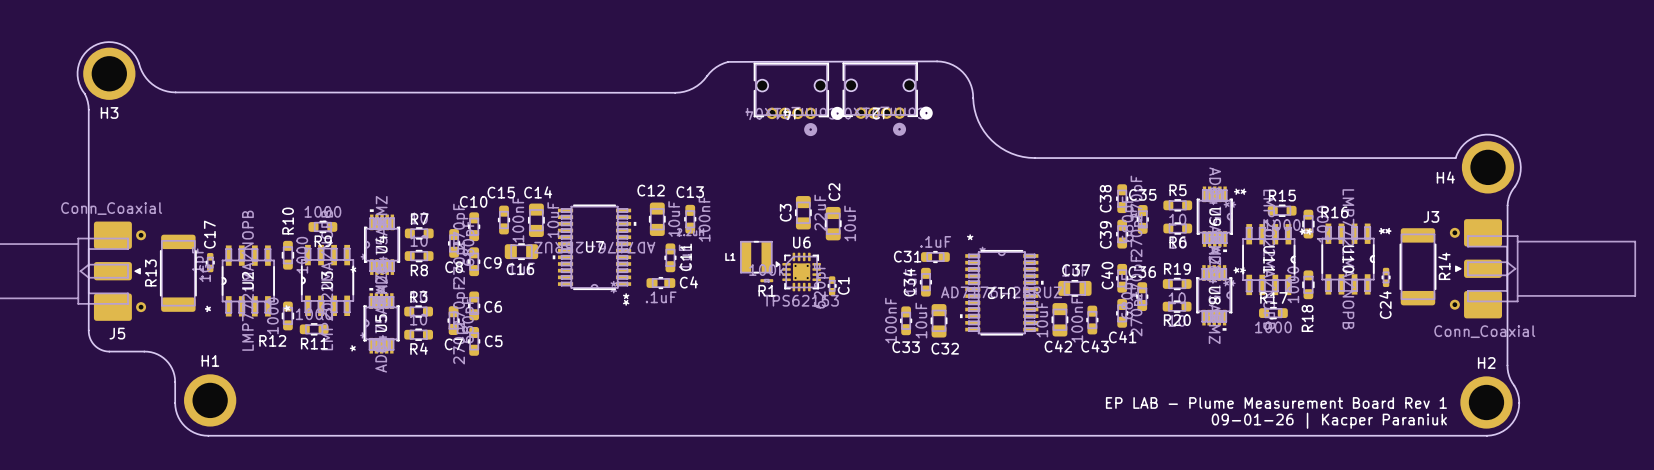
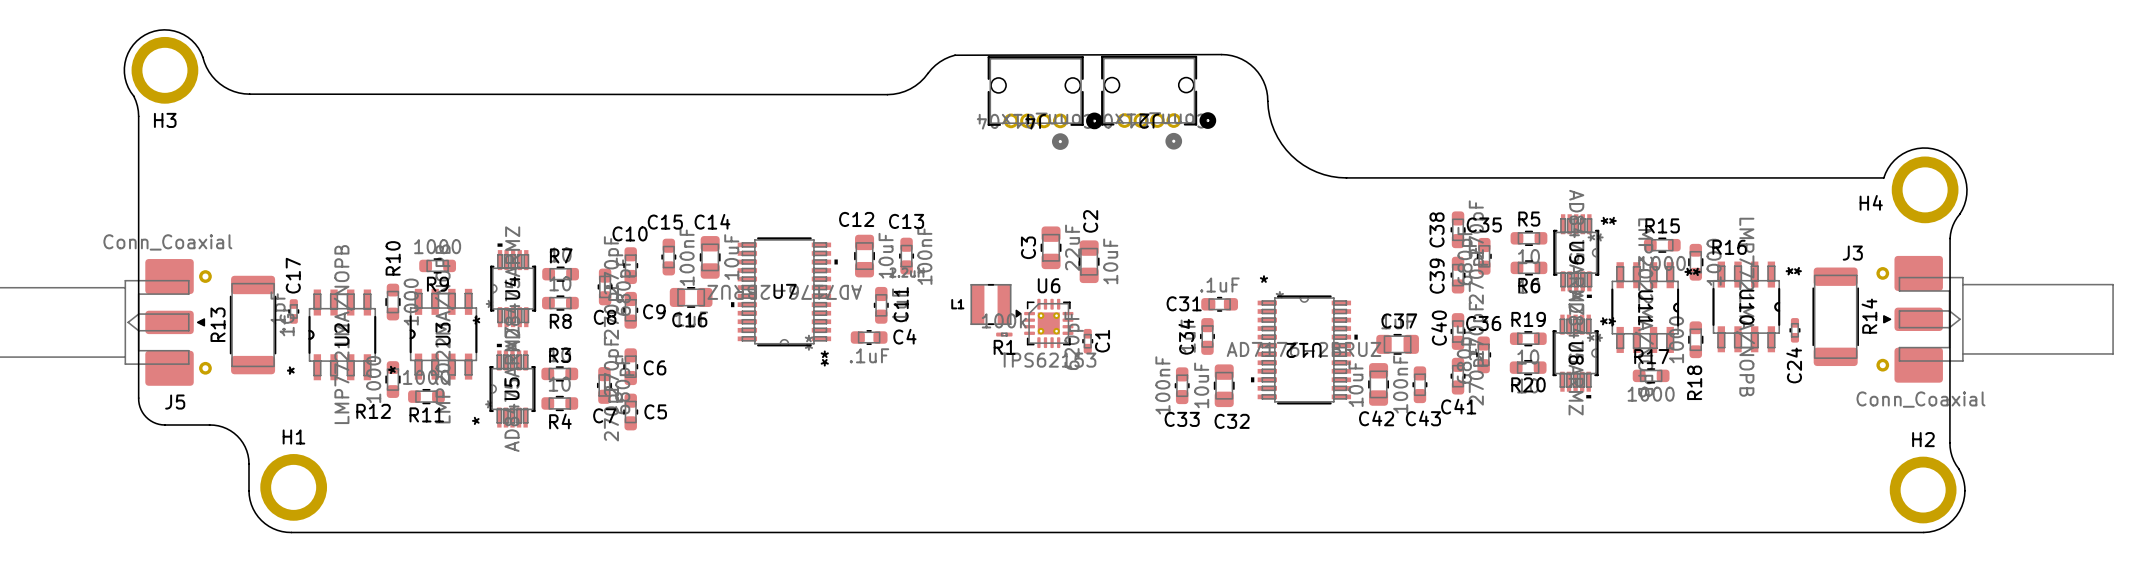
text: EP LAB - Plume Measurement Board Rev 1 (1276, 402) -> none
text: 09-01-26 | Kacper Paraniuk (1329, 420) -> none

